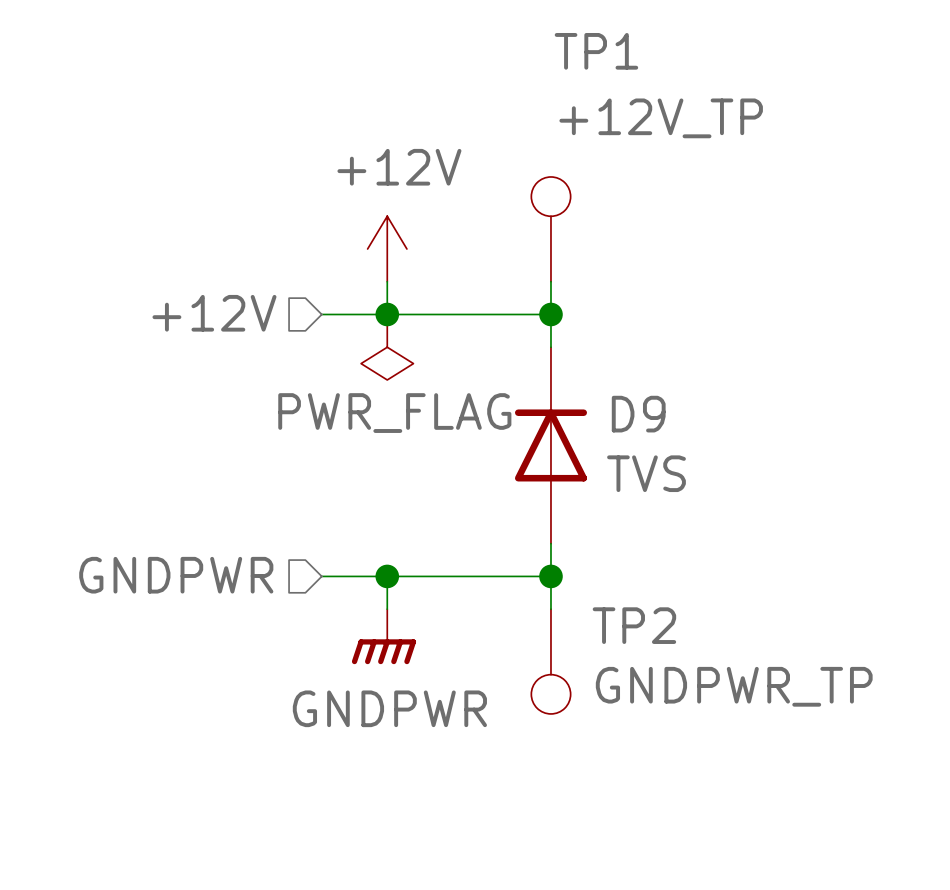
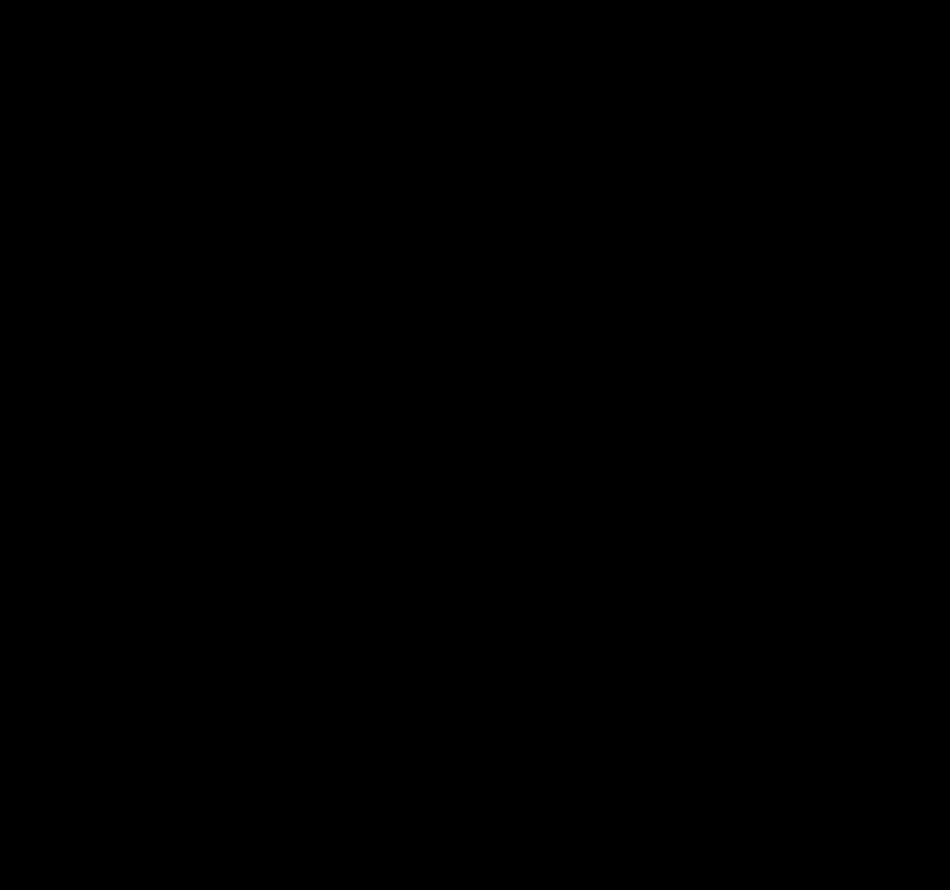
TP1: +12V_TP (550, 229) -> none
power symbol: +12V (387, 249) -> none
wire: (387, 281) (387, 314) -> none
wire: (550, 281) (550, 347) -> none
hierarchical label: +12V (214, 313) -> none
wire: (321, 314) (550, 314) -> none
junction: (387, 314) -> none
junction: (550, 314) -> none
power symbol: PWR_FLAG (387, 347) -> none
D9: TVS (550, 445) -> none
wire: (550, 543) (550, 609) -> none
hierarchical label: GNDPWR (176, 575) -> none
wire: (321, 576) (550, 576) -> none
wire: (387, 576) (387, 609) -> none
junction: (387, 576) -> none
junction: (550, 576) -> none
power symbol: GNDPWR (384, 636) -> none
TP2: GNDPWR_TP (550, 661) -> none

